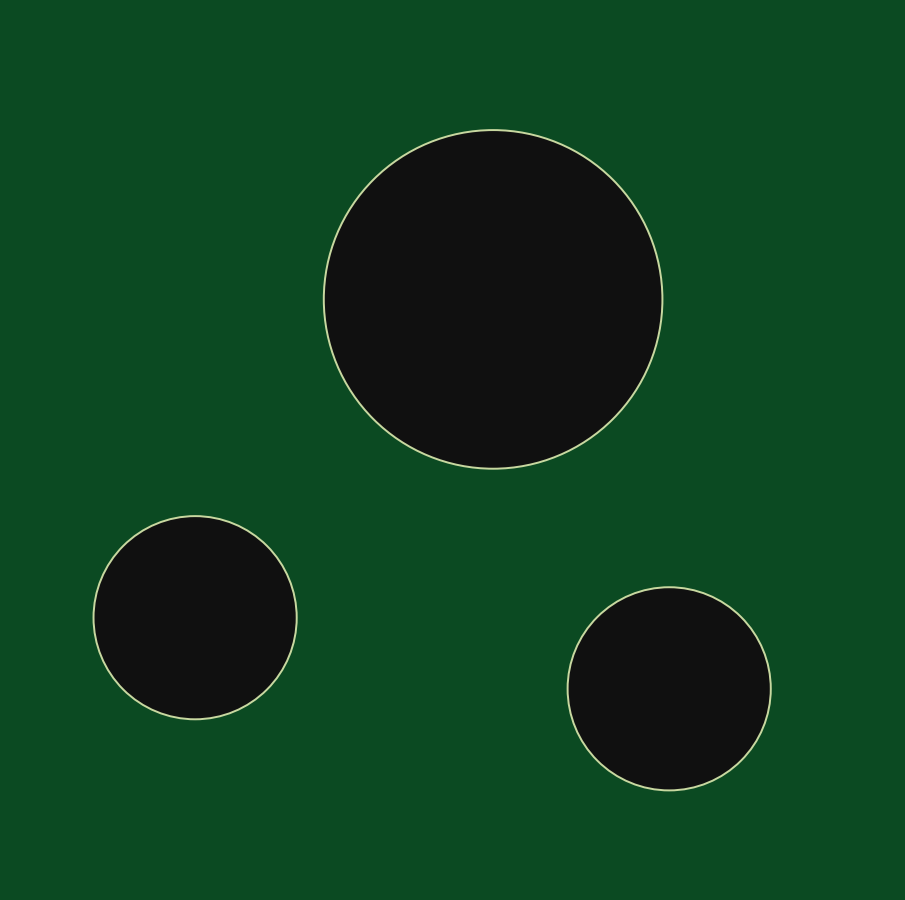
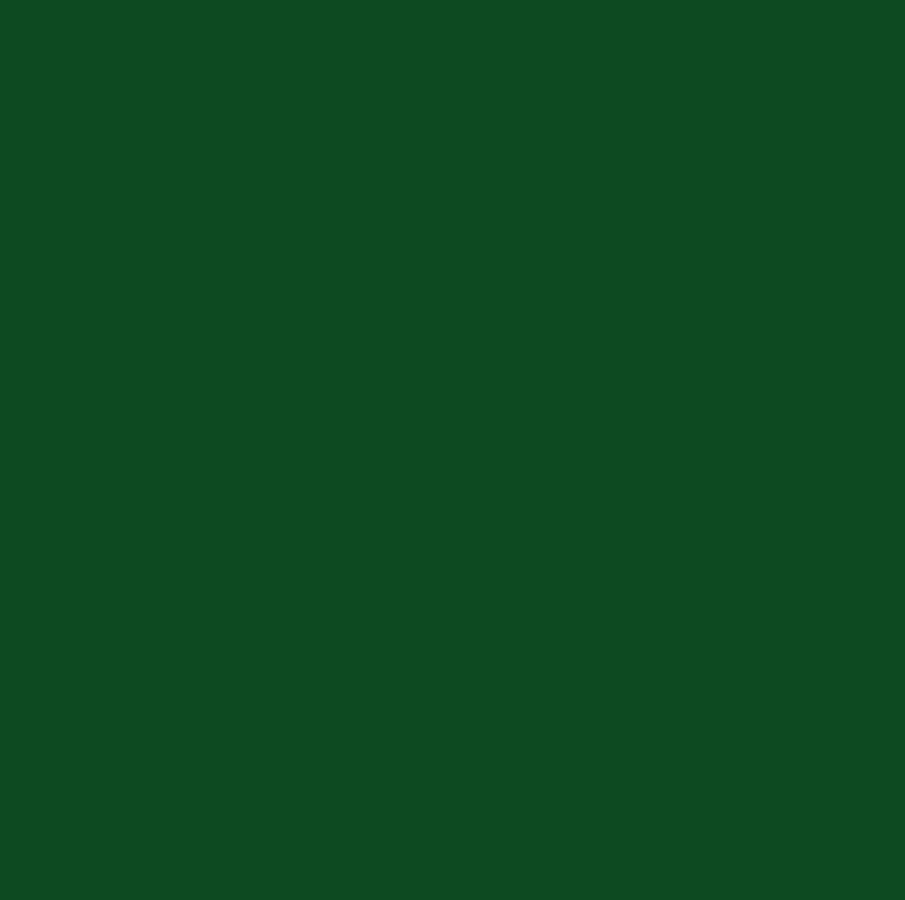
part: (432, 460) -> none

